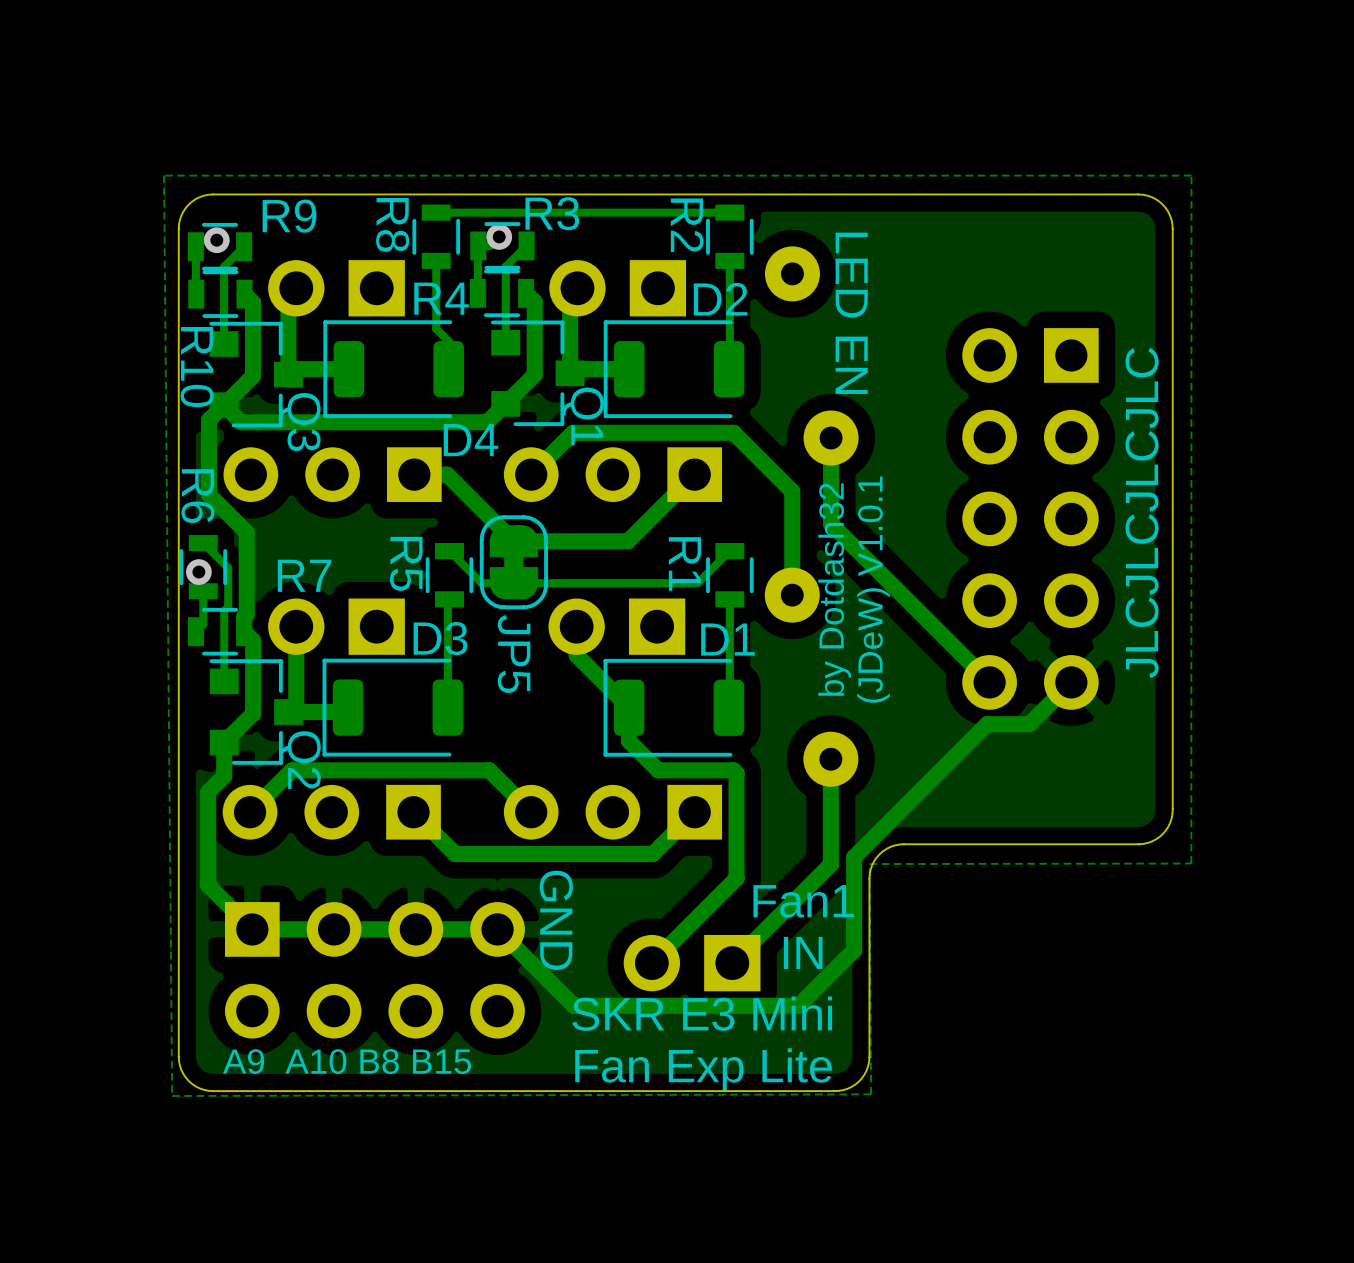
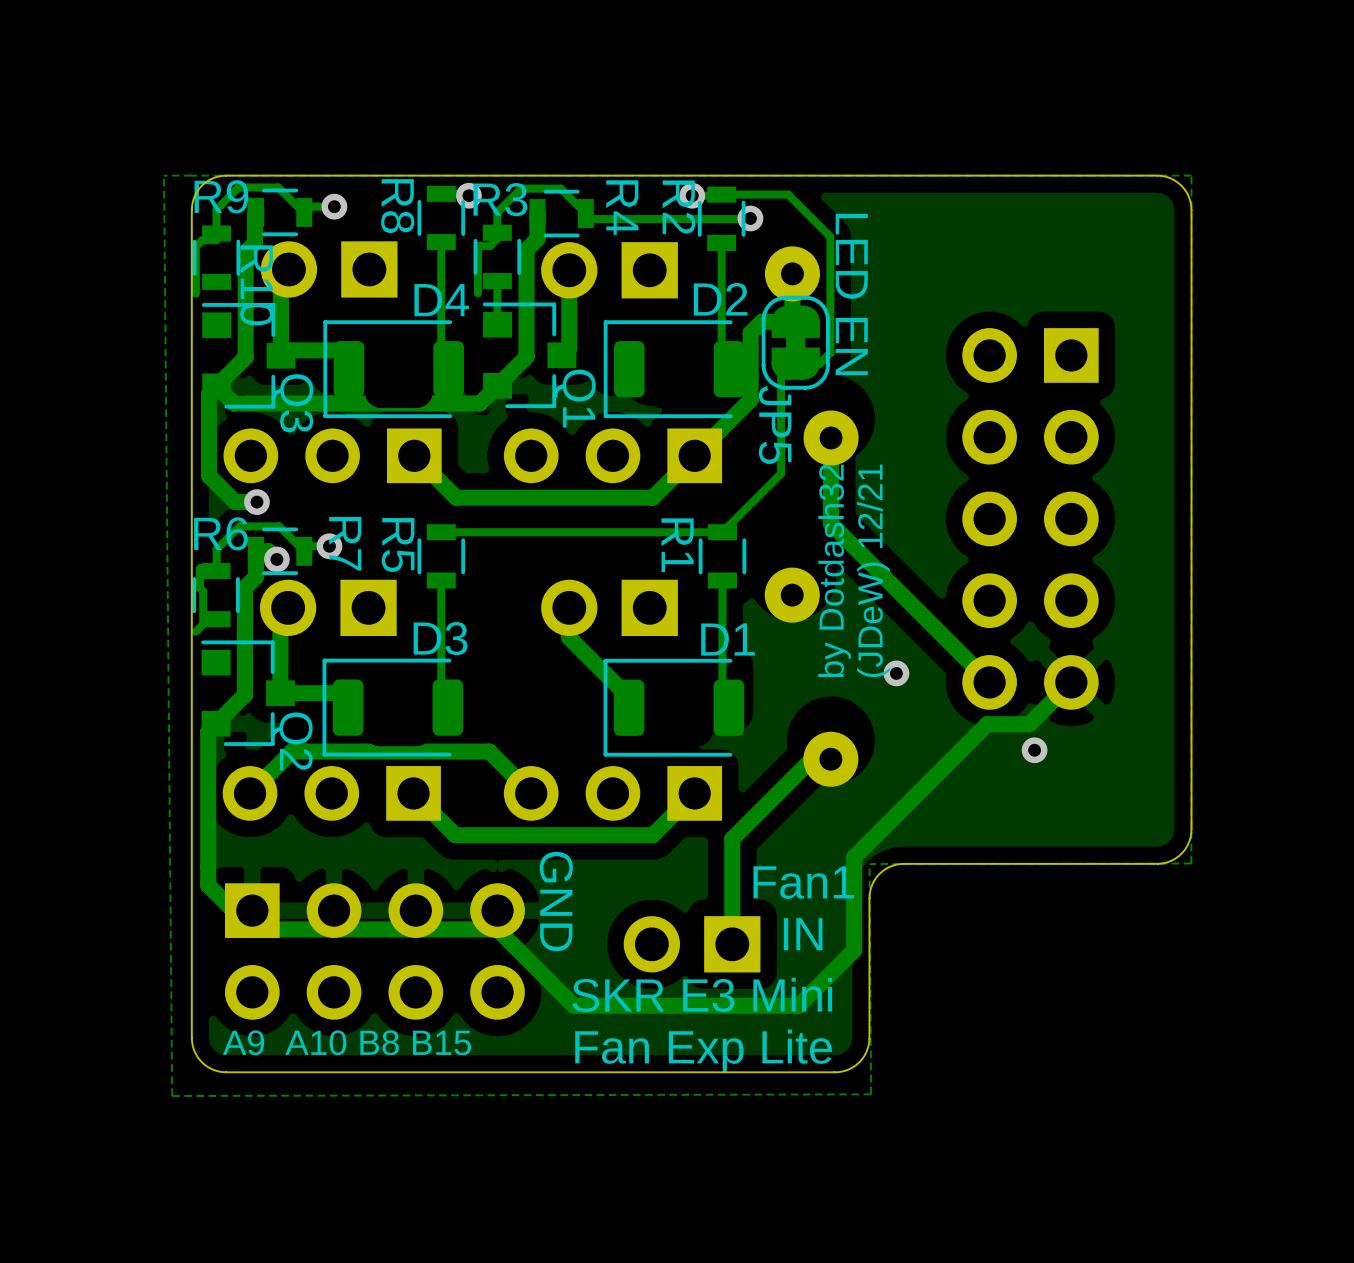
track: none -> (692, 195) (788, 194) (830, 236) (830, 352) (819, 363) (795, 363) (781, 378) (781, 473) (722, 532) (441, 532)
via: none -> (692, 195)
track: none -> (334, 206) (309, 206) (303, 212) (278, 187) (238, 187) (216, 209) (216, 233)
via: none -> (334, 206)
track: (729, 212) (436, 212) -> none
track: none -> (537, 213) (537, 238) (526, 249) (526, 356) (479, 403) (233, 403) (216, 386)
R9 name position: R9 (289, 216) -> R9 (221, 196)
track: none -> (750, 218) (591, 219) (560, 188) (521, 188) (497, 212) (497, 232)
via: none -> (750, 218)
R8 position: (436, 236) -> (441, 217)
via position: (499, 236) -> (468, 195)
R2 position: (729, 236) -> (721, 218)
via: (216, 240) -> none
track: none -> (441, 242) (441, 350)
R3 rotation: 0° (502, 245) -> 90° clockwise (497, 256)
track: (526, 245) (505, 266) (505, 342) -> none
R9 rotation: 0° (220, 246) -> 90° clockwise (216, 257)
track: (244, 246) (224, 266) (224, 344) -> none
track: none -> (792, 255) (792, 318) (795, 321) (761, 321) (750, 333) (750, 399) (652, 497) (456, 497) (414, 455)
track: (436, 260) (436, 328) (448, 341) (448, 369) -> none
track: (729, 260) (729, 369) -> (721, 242) (720, 351)
track: none -> (569, 270) (569, 347) (561, 355)
track: none -> (497, 281) (497, 324)
track: (296, 288) (288, 296) (288, 374) (293, 369) (348, 369) -> (288, 269) (281, 277) (281, 355) (286, 350) (341, 350)
part position: (336, 288) -> (329, 269)
track: (577, 288) (570, 295) (570, 373) (574, 369) (629, 369) -> none
part position: (617, 288) -> (609, 270)
R4 position: (502, 293) -> (561, 213)
track: (526, 293) (534, 301) (534, 374) (487, 422) (241, 422) (224, 405) -> none
R10 position: (220, 294) -> (280, 212)
track: (244, 294) (253, 302) (253, 376) (209, 420) -> (255, 212) (255, 242) (245, 252) (245, 357) (209, 394) (209, 420)
R4 name rotation: 0° (441, 298) -> 90° clockwise (622, 207)
R4 name position: R4 (441, 298) -> R4 (622, 207)
text position: LED EN (851, 313) -> LED EN (851, 294)
Q1 position: (537, 373) -> (529, 355)
Q3 position: (256, 374) -> (248, 355)
D4 name position: D4 (470, 440) -> D4 (441, 300)
part position: (332, 474) -> (332, 455)
track: (531, 474) (573, 432) (733, 432) (792, 491) (792, 595) -> none
part position: (612, 474) -> (612, 455)
track: (694, 474) (627, 541) (513, 541) (447, 474) (414, 474) -> none
track: (209, 475) (209, 494) (246, 532) (246, 614) (244, 616) (244, 631) (253, 640) (253, 713) (224, 742) (224, 776) (208, 792) -> (276, 559) (268, 551) (255, 551) (255, 576) (245, 587) (245, 694) (208, 731) (208, 792)
track: none -> (209, 475) (235, 502) (256, 502)
R6 name rotation: 0° (197, 496) -> 90° counterclockwise (221, 533)
via: none -> (256, 502)
text: JLCJLCJLCJLC (1142, 512) -> none
track: (203, 543) (228, 567) (228, 606) (224, 610) (224, 681) -> none
track: none -> (329, 546) (309, 546) (304, 551) (279, 526) (239, 526) (216, 549) (216, 570)
via: none -> (329, 546)
track: (729, 551) (697, 583) (481, 583) (449, 551) -> none
via: none -> (276, 559)
JP5 position: (513, 562) -> (795, 342)
R6 position: (203, 567) -> (216, 595)
via: (198, 572) -> none
R7 name rotation: 0° (304, 575) -> 90° clockwise (345, 543)
R5 position: (449, 575) -> (441, 556)
R1 position: (729, 575) -> (722, 556)
track: none -> (441, 580) (441, 687) (439, 688)
track: none -> (722, 580) (722, 687) (720, 689)
text position: by Dotdash32 (834, 589) -> by Dotdash32 (834, 570)
text: (JDeW) V1.0.1 (873, 589) -> (JDeW) 12/21 (873, 570)
track: (449, 599) (447, 600) (447, 707) -> none
track: (729, 599) (728, 707) -> none
track: none -> (288, 607) (280, 615) (280, 693) (335, 693) (339, 688)
track: none -> (569, 607) (569, 637) (621, 689)
track: (296, 626) (296, 704) (288, 712) (343, 712) (348, 707) -> none
part position: (336, 626) -> (328, 607)
track: (576, 626) (576, 655) (629, 707) (629, 741) (658, 770) (733, 770) (736, 773) (736, 878) (651, 963) -> none
part position: (616, 626) -> (609, 607)
R7 position: (220, 631) -> (280, 551)
JP5 name position: JP5 (514, 654) -> JP5 (775, 424)
via: none -> (896, 673)
Q2 position: (256, 712) -> (248, 693)
track: none -> (830, 740) (732, 839) (732, 944)
via: none -> (1034, 750)
track: (830, 759) (830, 864) (732, 963) -> none
part position: (331, 812) -> (331, 793)
track: (531, 812) (489, 770) (291, 770) (250, 812) -> (531, 793) (489, 751) (291, 751) (250, 793)
part position: (612, 812) -> (612, 793)
track: (694, 812) (652, 854) (455, 854) (413, 812) -> (694, 793) (652, 835) (455, 835) (413, 793)
board edge: (869, 898) (869, 874) (872, 865) (879, 854) (894, 845) (1139, 844) (1152, 841) (1159, 836) (1170, 822) (1172, 809) (1172, 228) (1170, 215) (1162, 204) (1151, 197) (1138, 194) (213, 194) (199, 197) (188, 204) (181, 215) (178, 228) (178, 1056) (181, 1069) (185, 1077) (199, 1088) (213, 1091) (838, 1090) (855, 1084) (864, 1074) (869, 1062) (869, 1038) -> (869, 898) (870, 889) (876, 877) (886, 868) (899, 864) (1158, 863) (1171, 860) (1178, 856) (1189, 841) (1191, 828) (1191, 209) (1188, 196) (1181, 185) (1170, 178) (1157, 175) (226, 175) (213, 178) (201, 185) (194, 196) (191, 209) (191, 1037) (194, 1051) (198, 1058) (213, 1069) (226, 1072) (834, 1072) (847, 1070) (858, 1062) (866, 1051) (869, 1038)
text position: Fan1 (803, 901) -> Fan1 (803, 882)
text position: GND (556, 920) -> GND (556, 901)
text position: IN (803, 952) -> IN (803, 934)
part position: (692, 963) -> (692, 944)
part position: (374, 970) -> (374, 951)
text position: SKR E3 Mini (702, 1013) -> SKR E3 Mini (702, 994)
text position: A9 A10 B8 B15 (347, 1061) -> A9 A10 B8 B15 (347, 1042)
text position: Fan Exp Lite (703, 1070) -> Fan Exp Lite (703, 1051)

